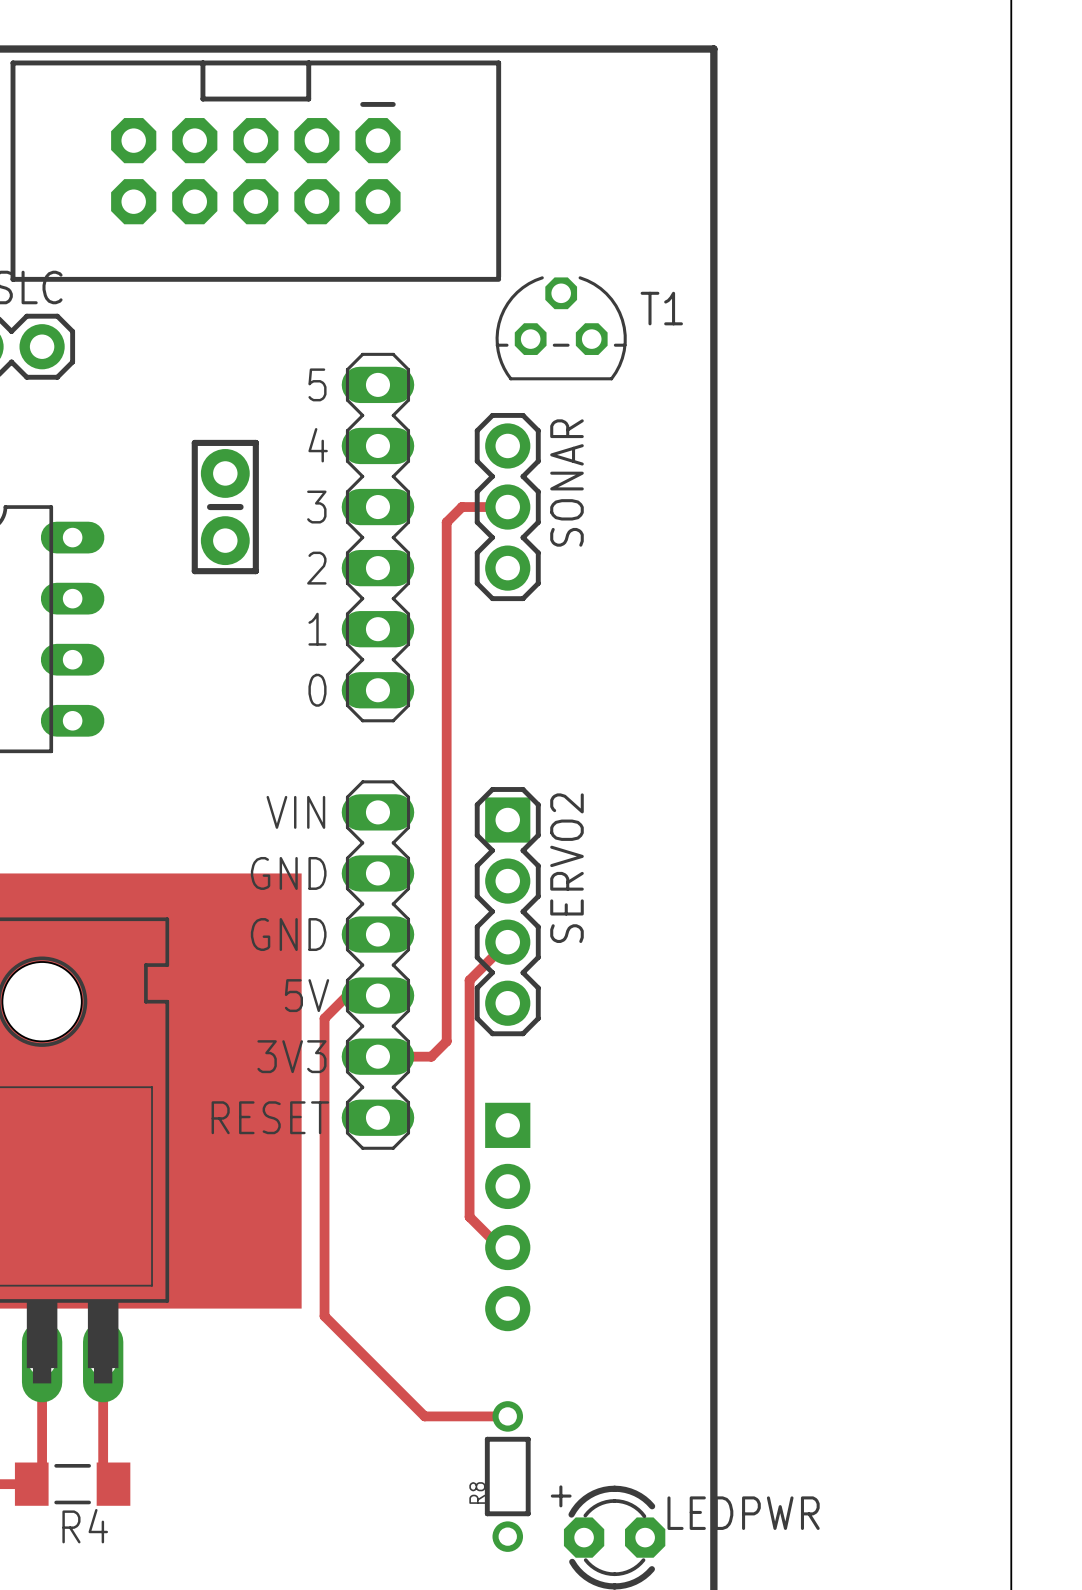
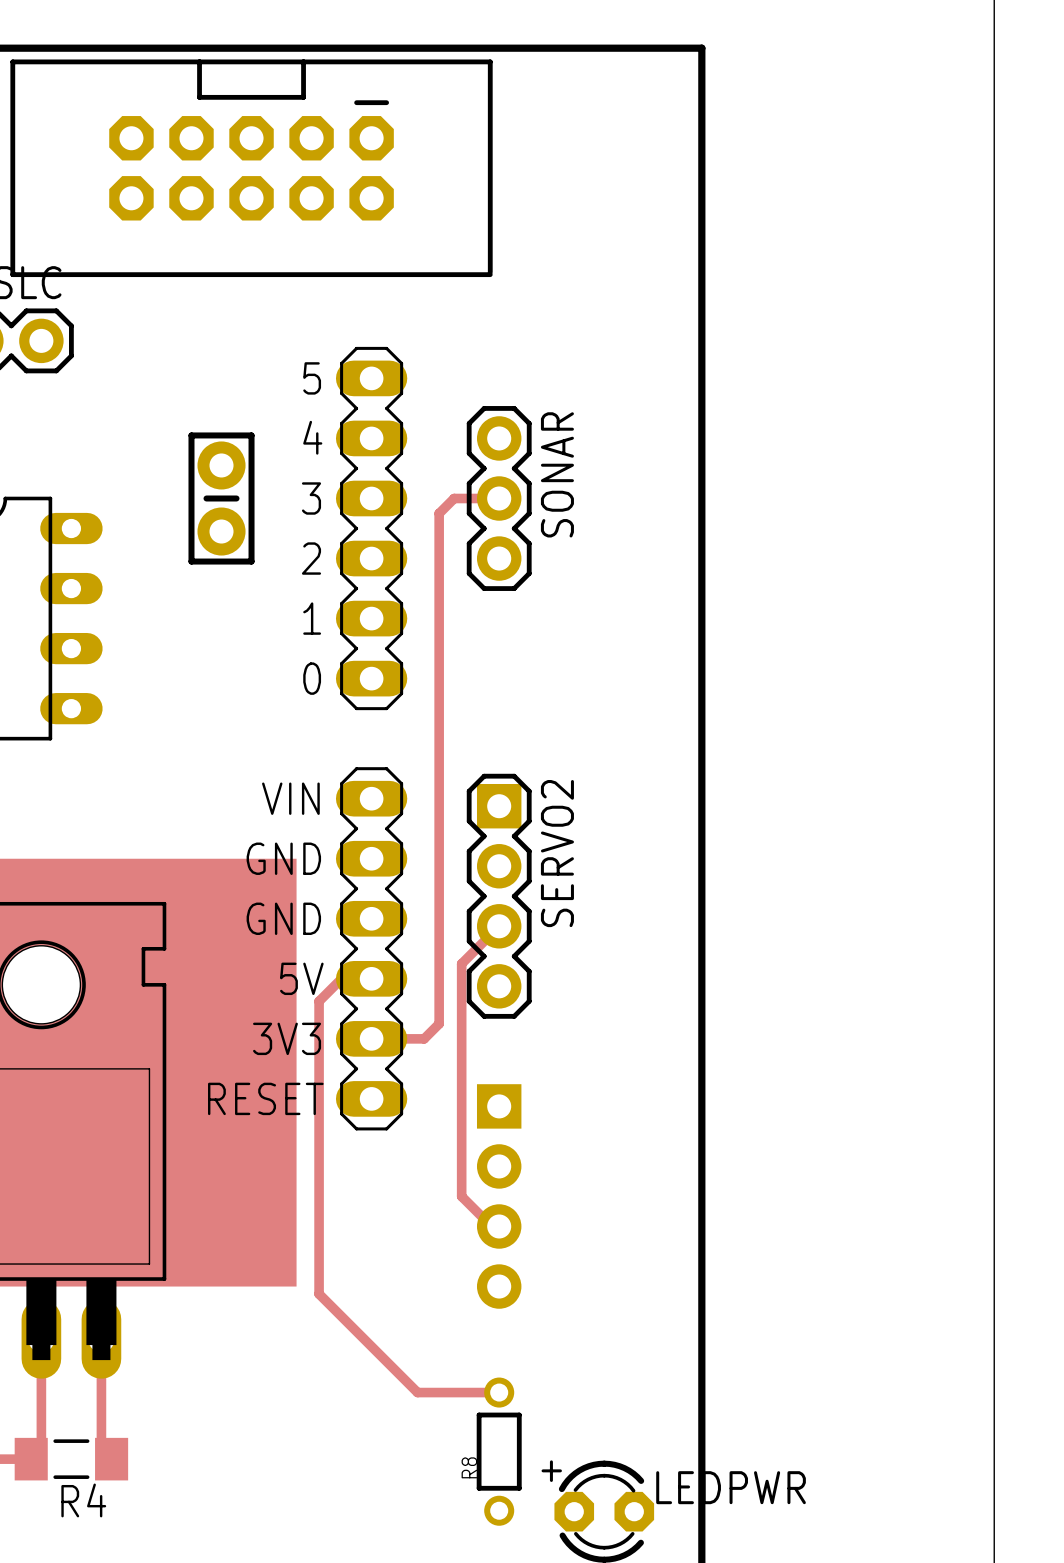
T1: (561, 328) -> none

